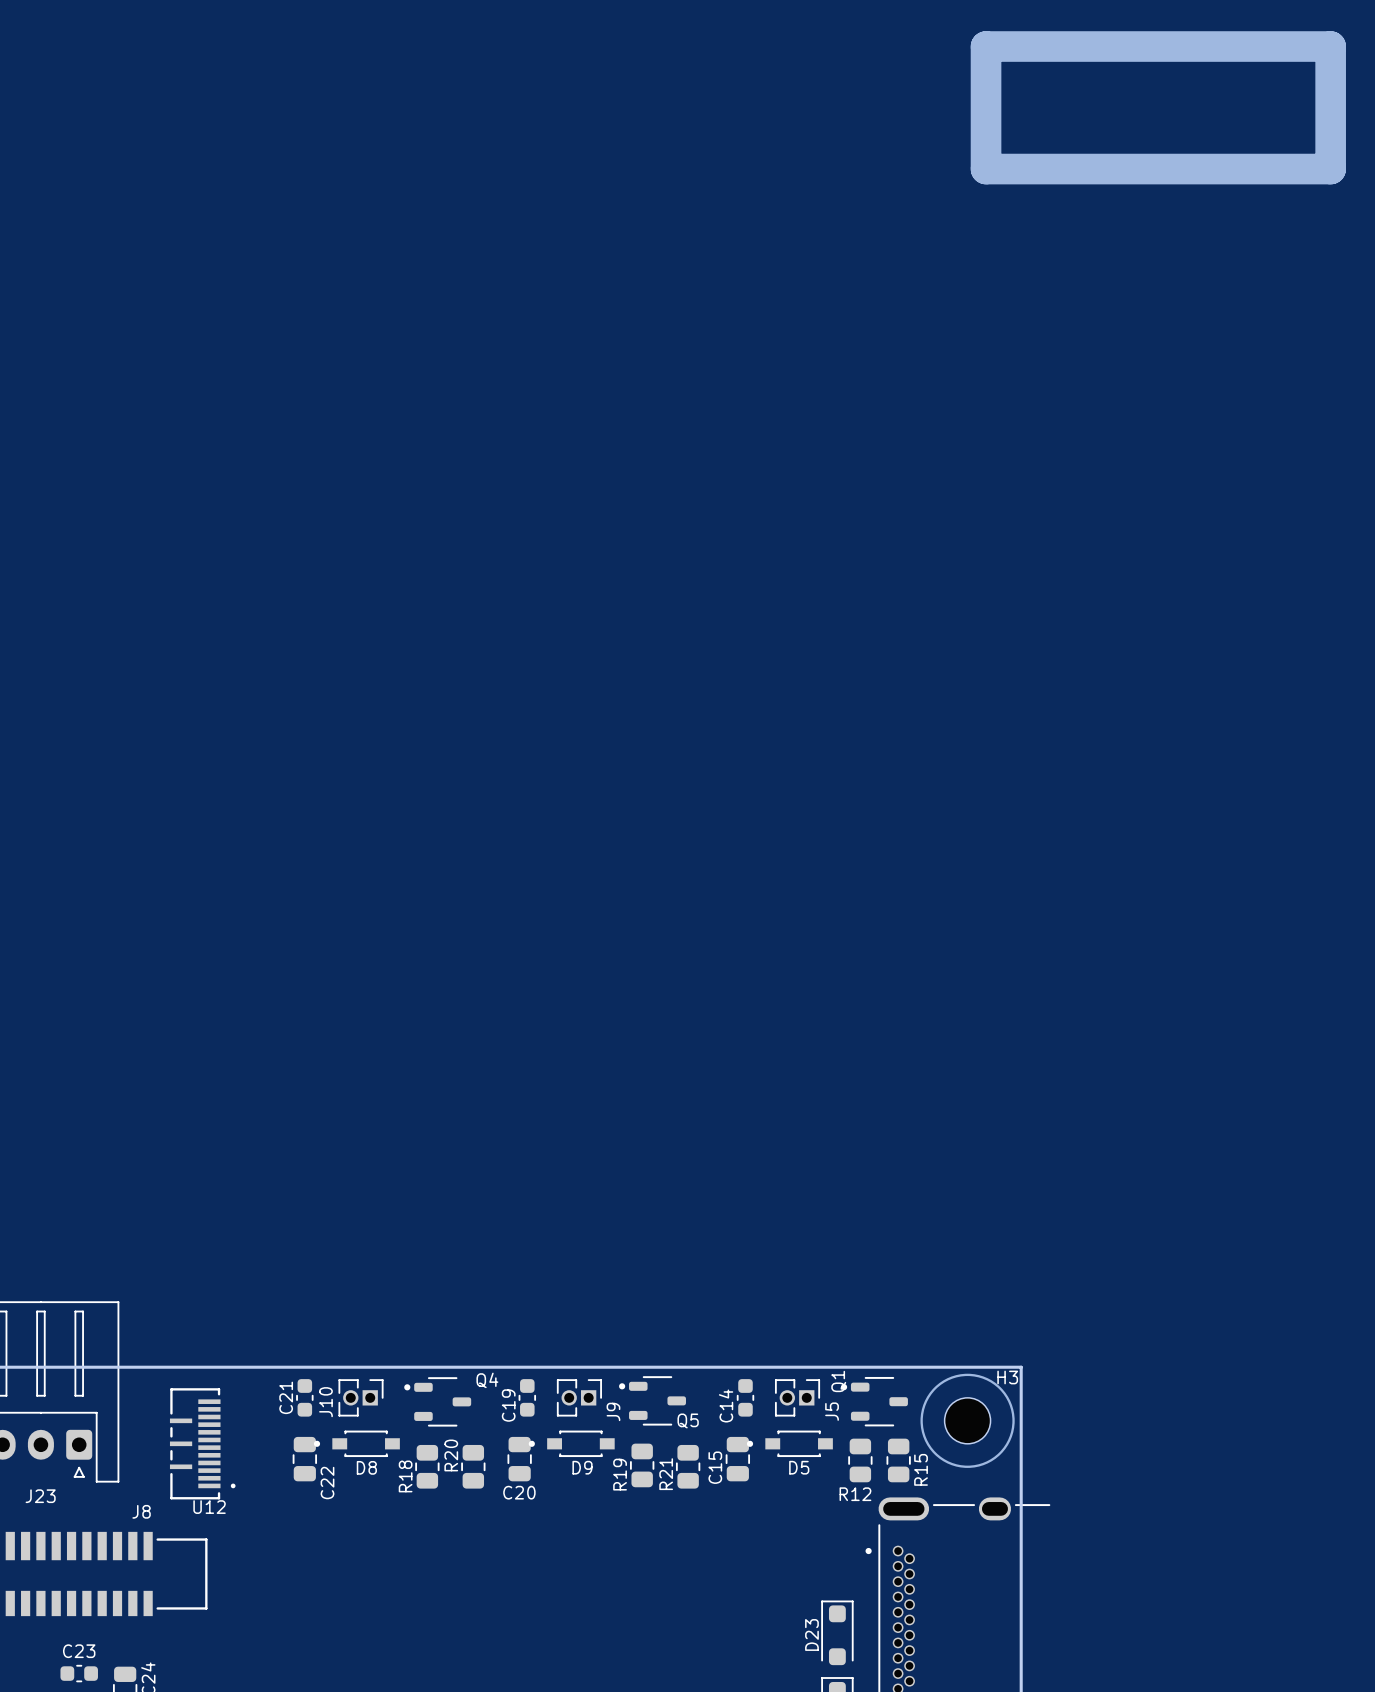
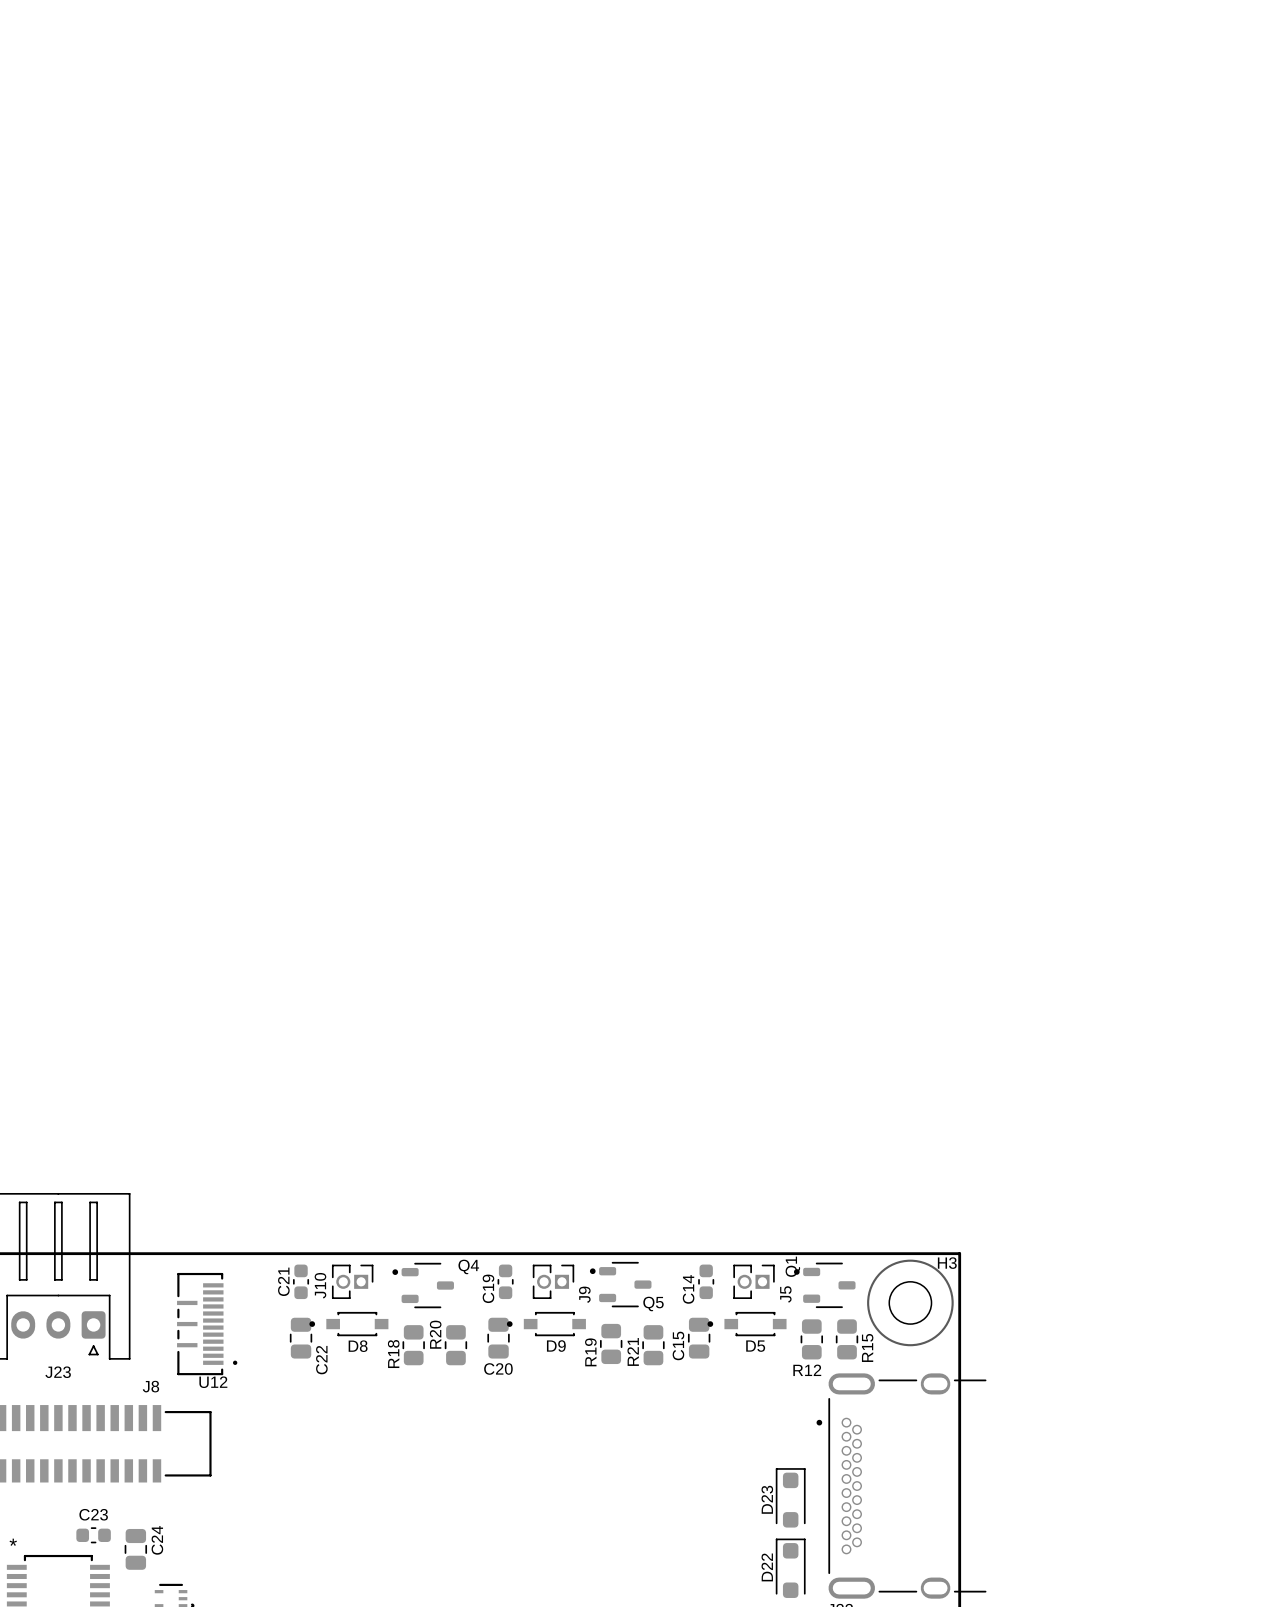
line: (986, 46) (1330, 46) (1330, 169) (986, 169) (986, 46) -> none

